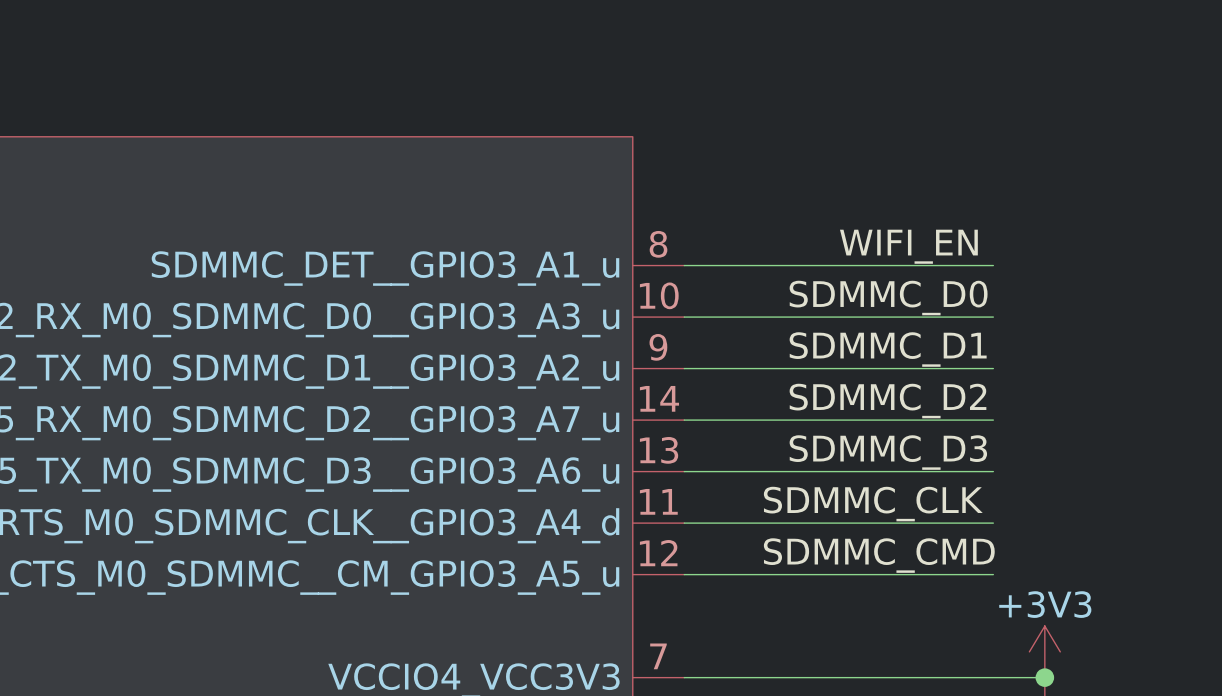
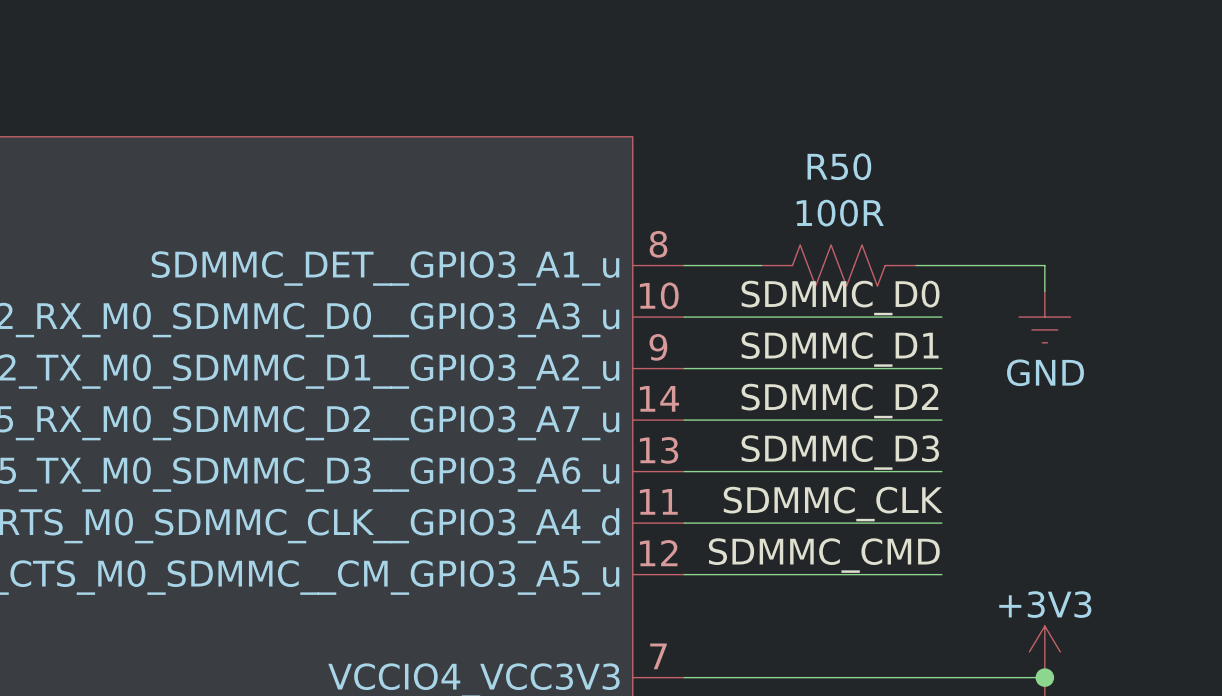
label: WIFI_EN (908, 246) -> none
wire: (761, 265) (916, 265) -> none
R50: none -> 100R (838, 265)
wire: none -> (993, 265) (1044, 265) (1044, 291)
label position: SDMMC_D0 (888, 298) -> SDMMC_D0 (840, 298)
wire: (941, 317) (993, 317) -> none
power symbol: none -> GND (1044, 317)
label position: SDMMC_D1 (888, 349) -> SDMMC_D1 (840, 349)
wire: (941, 368) (993, 368) -> none
label position: SDMMC_D2 (887, 401) -> SDMMC_D2 (839, 401)
wire: (941, 420) (993, 420) -> none
label position: SDMMC_D3 (888, 452) -> SDMMC_D3 (840, 452)
wire: (941, 471) (993, 471) -> none
label position: SDMMC_CLK (873, 504) -> SDMMC_CLK (833, 504)
wire: (941, 523) (993, 523) -> none
label position: SDMMC_CMD (879, 555) -> SDMMC_CMD (824, 555)
wire: (941, 574) (993, 574) -> none

